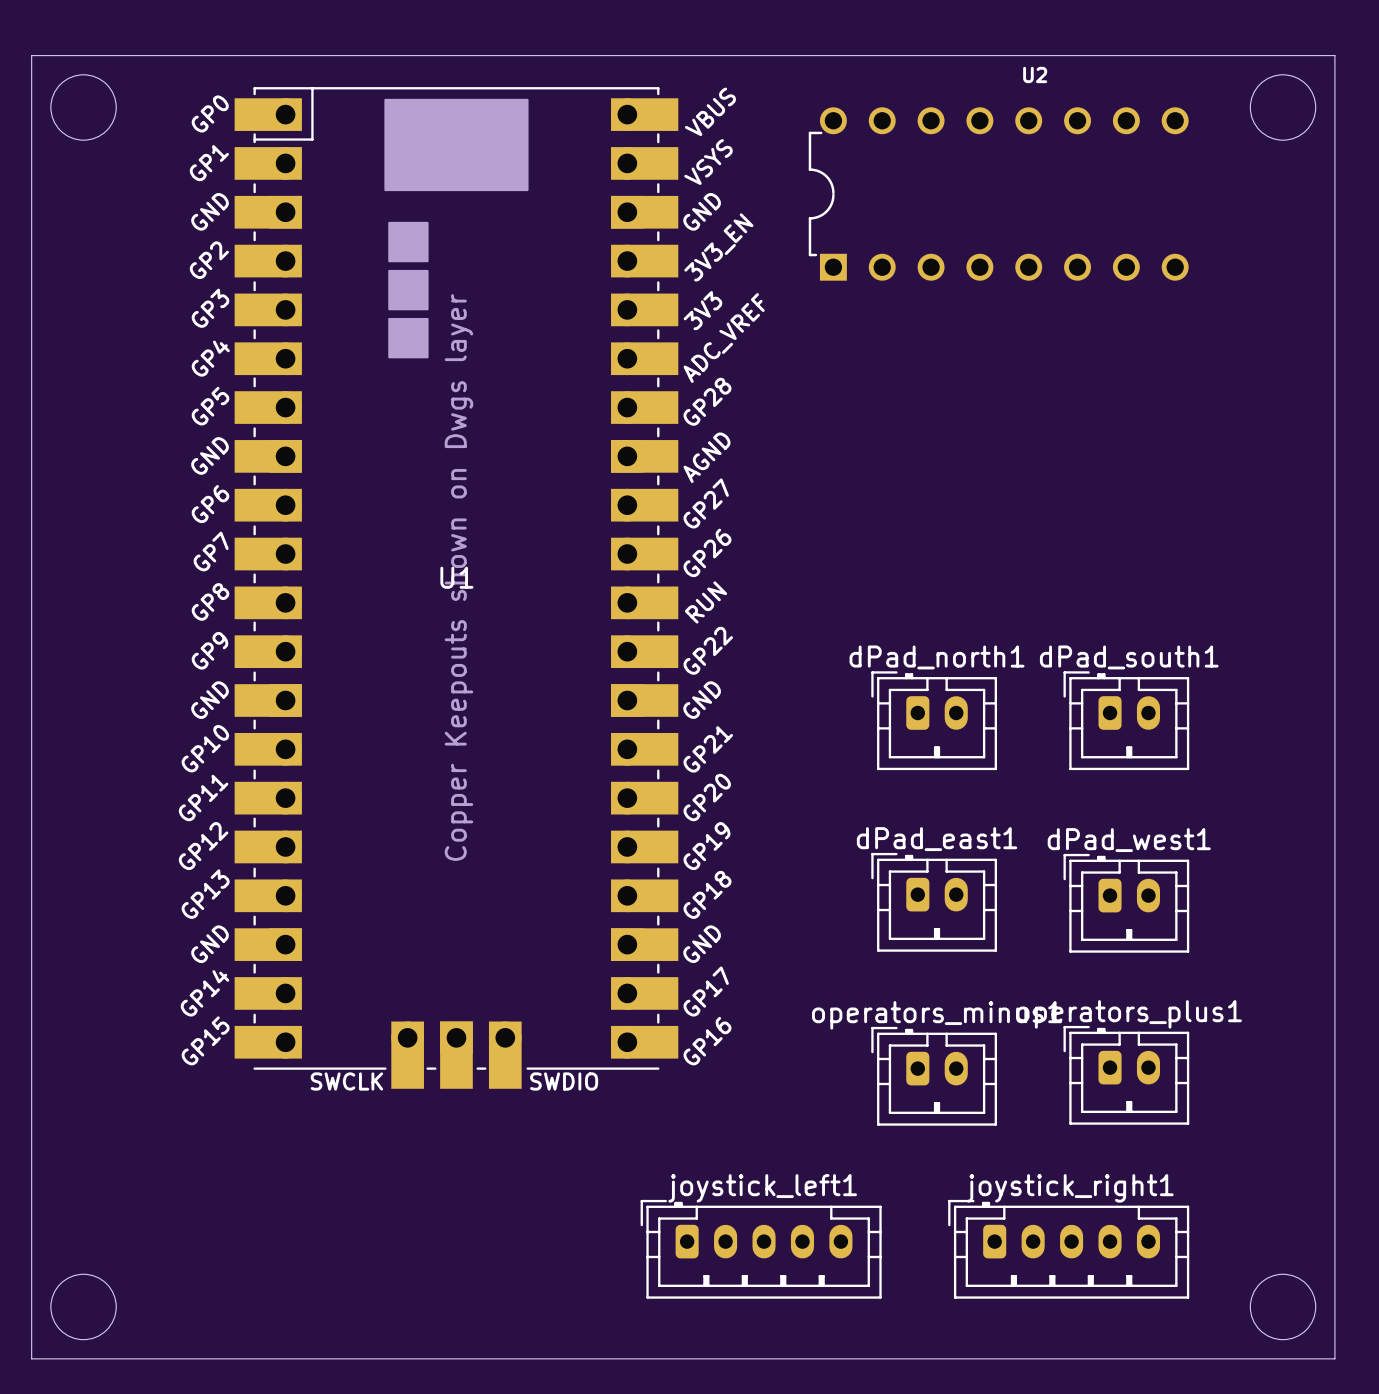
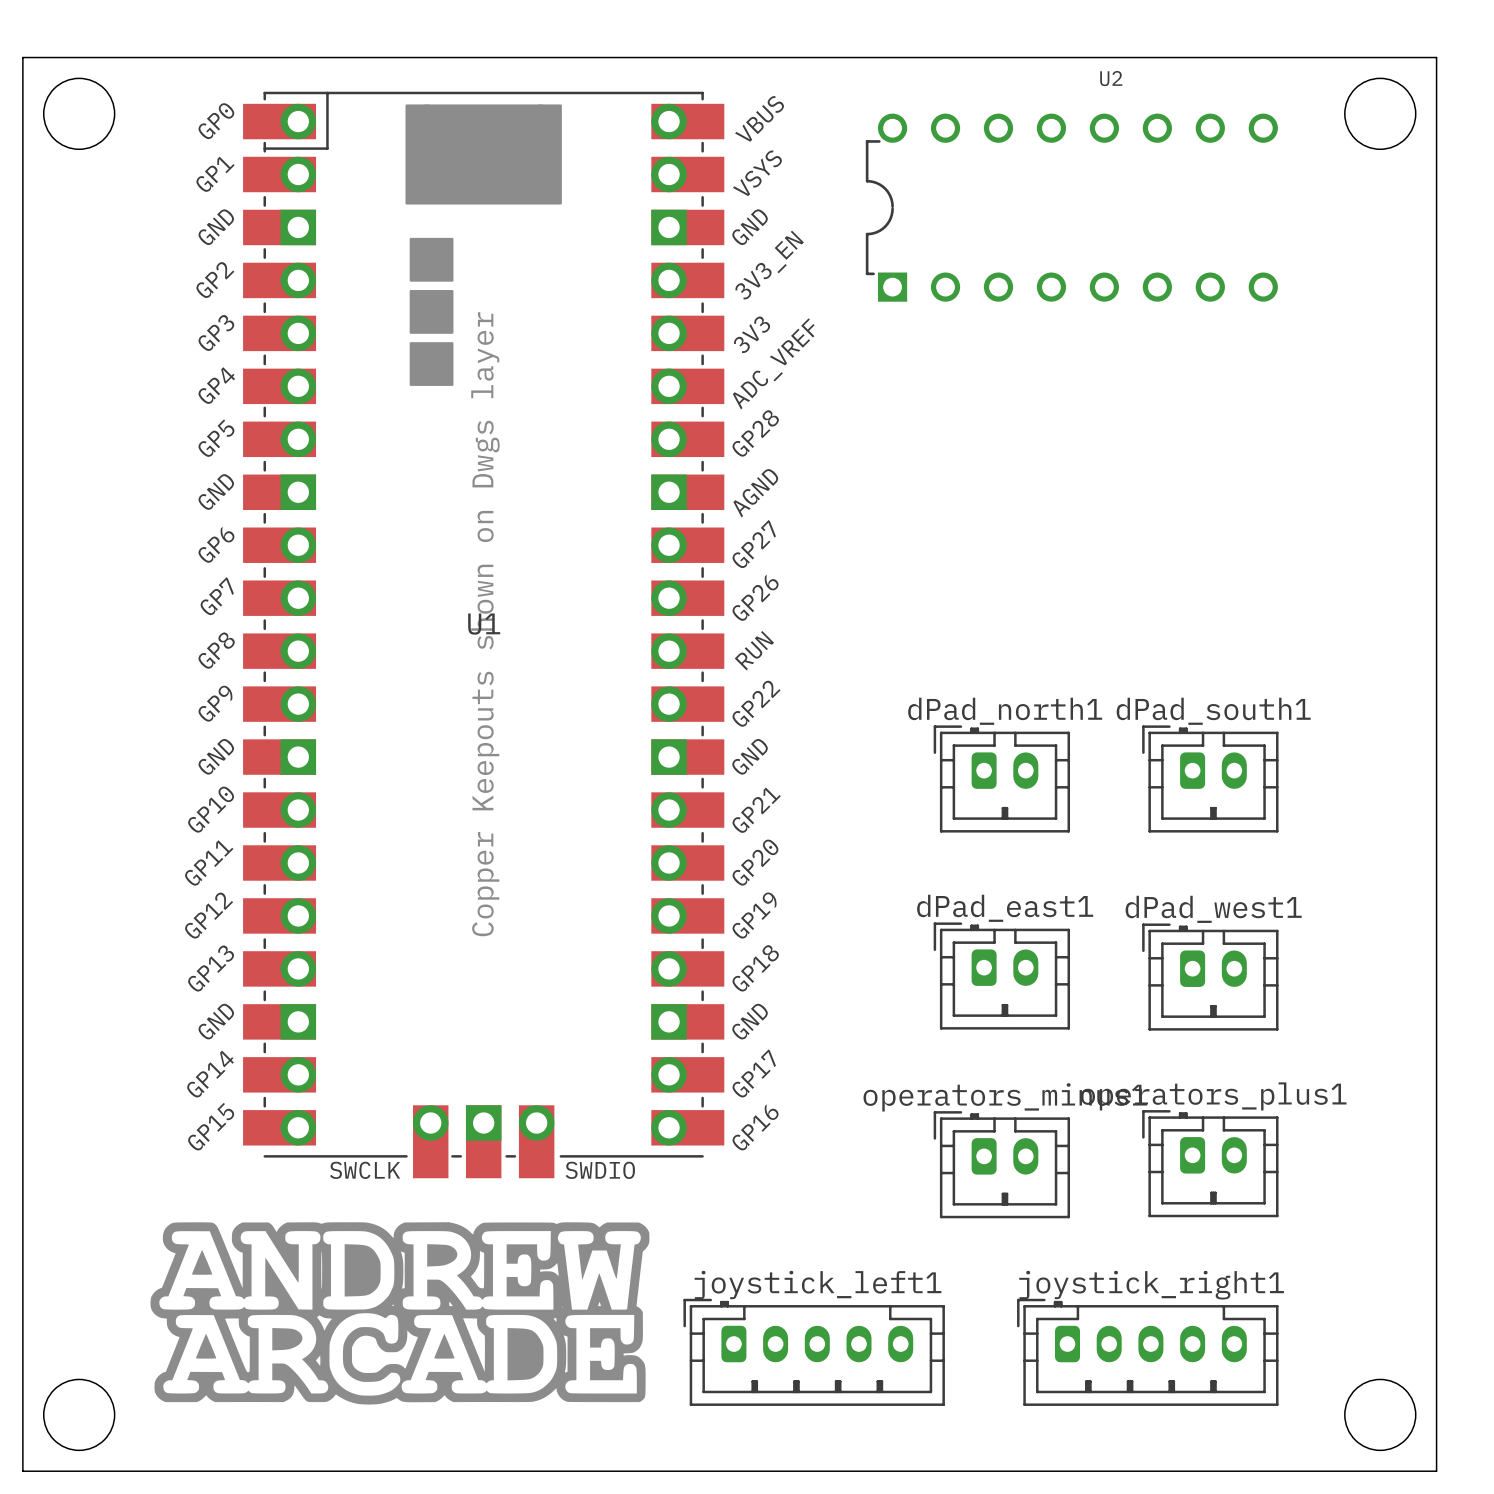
drawing: none -> [150, 1222, 650, 1405]

